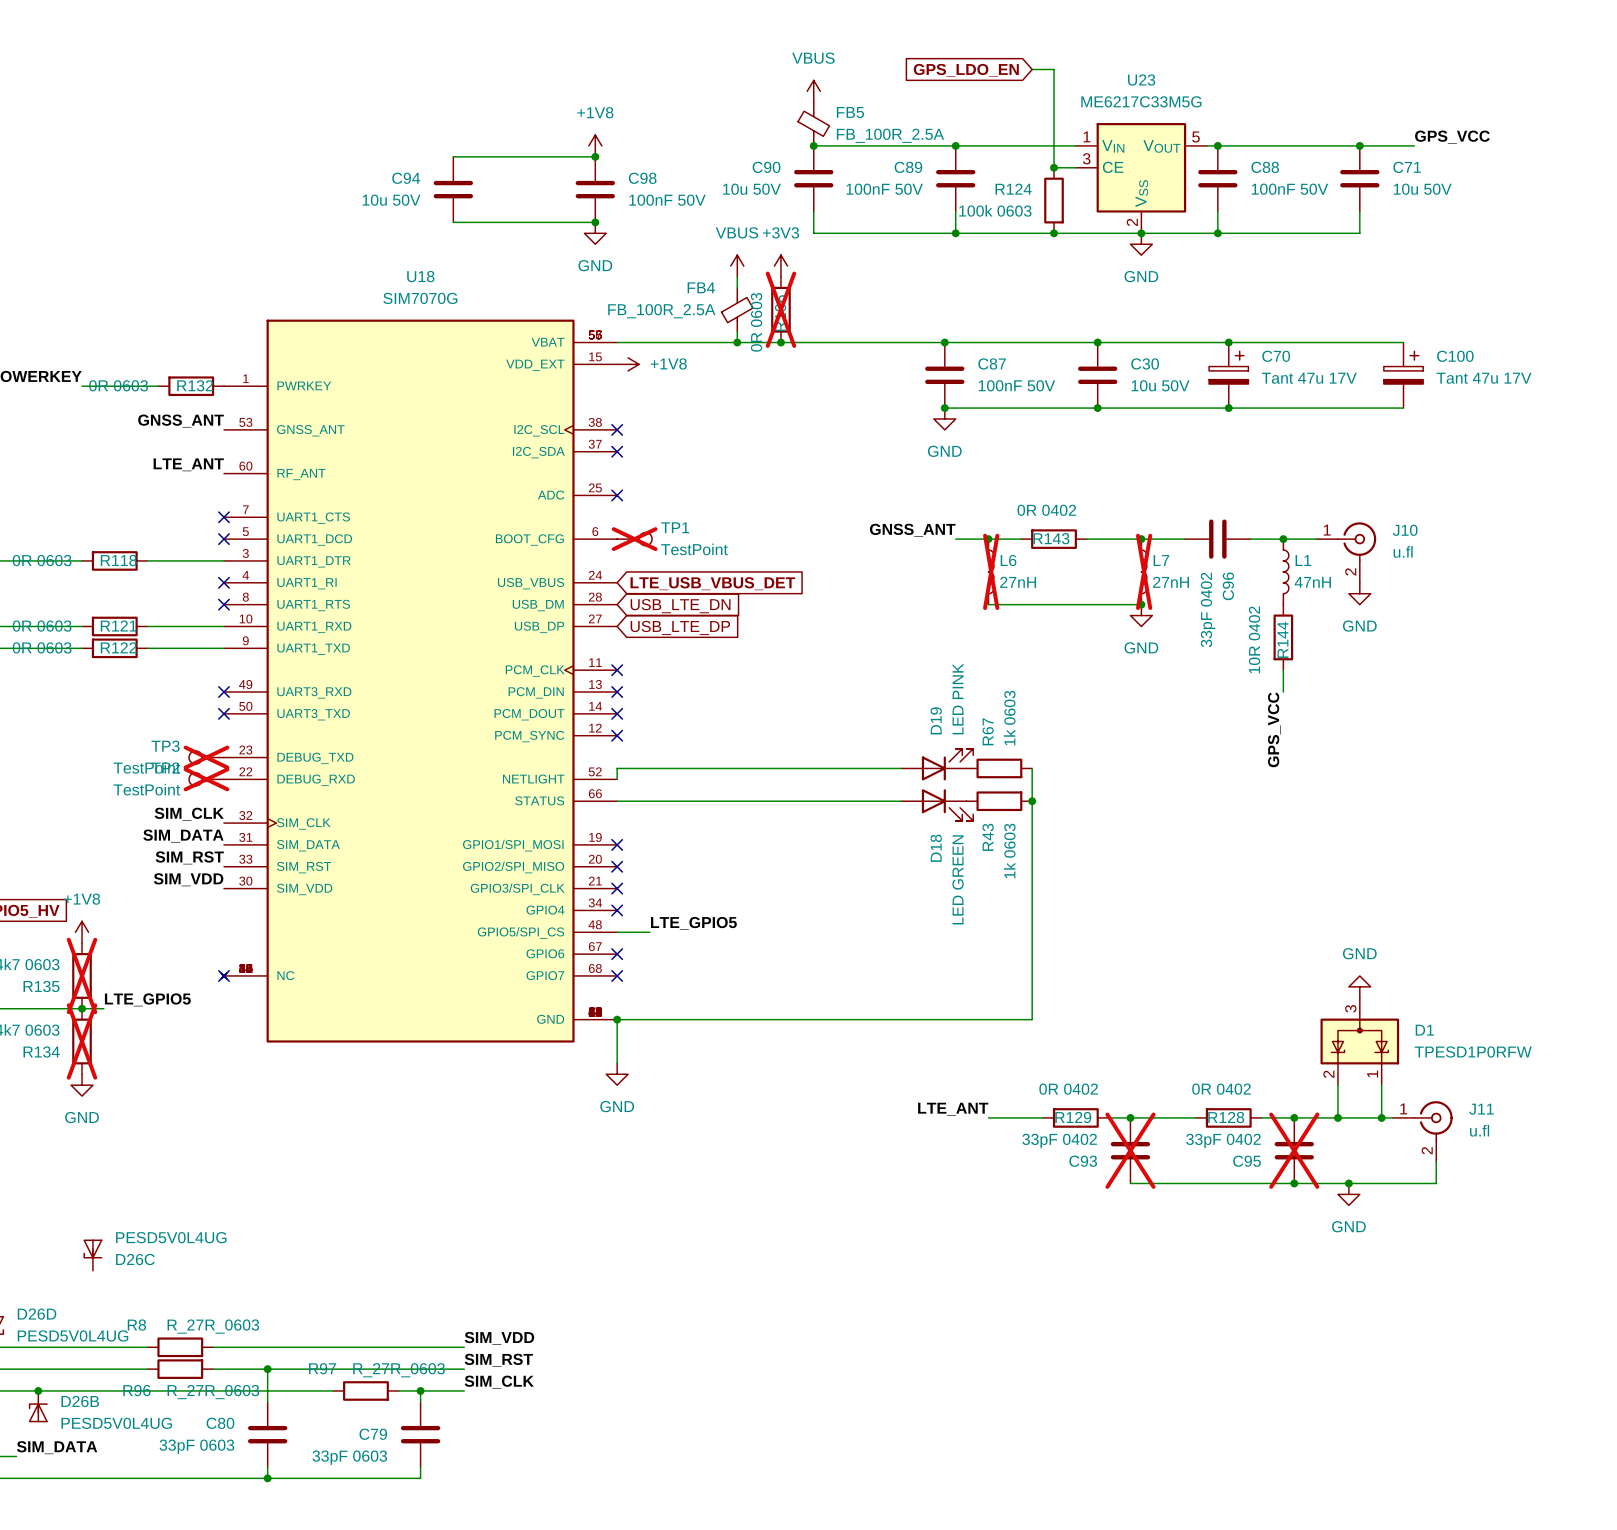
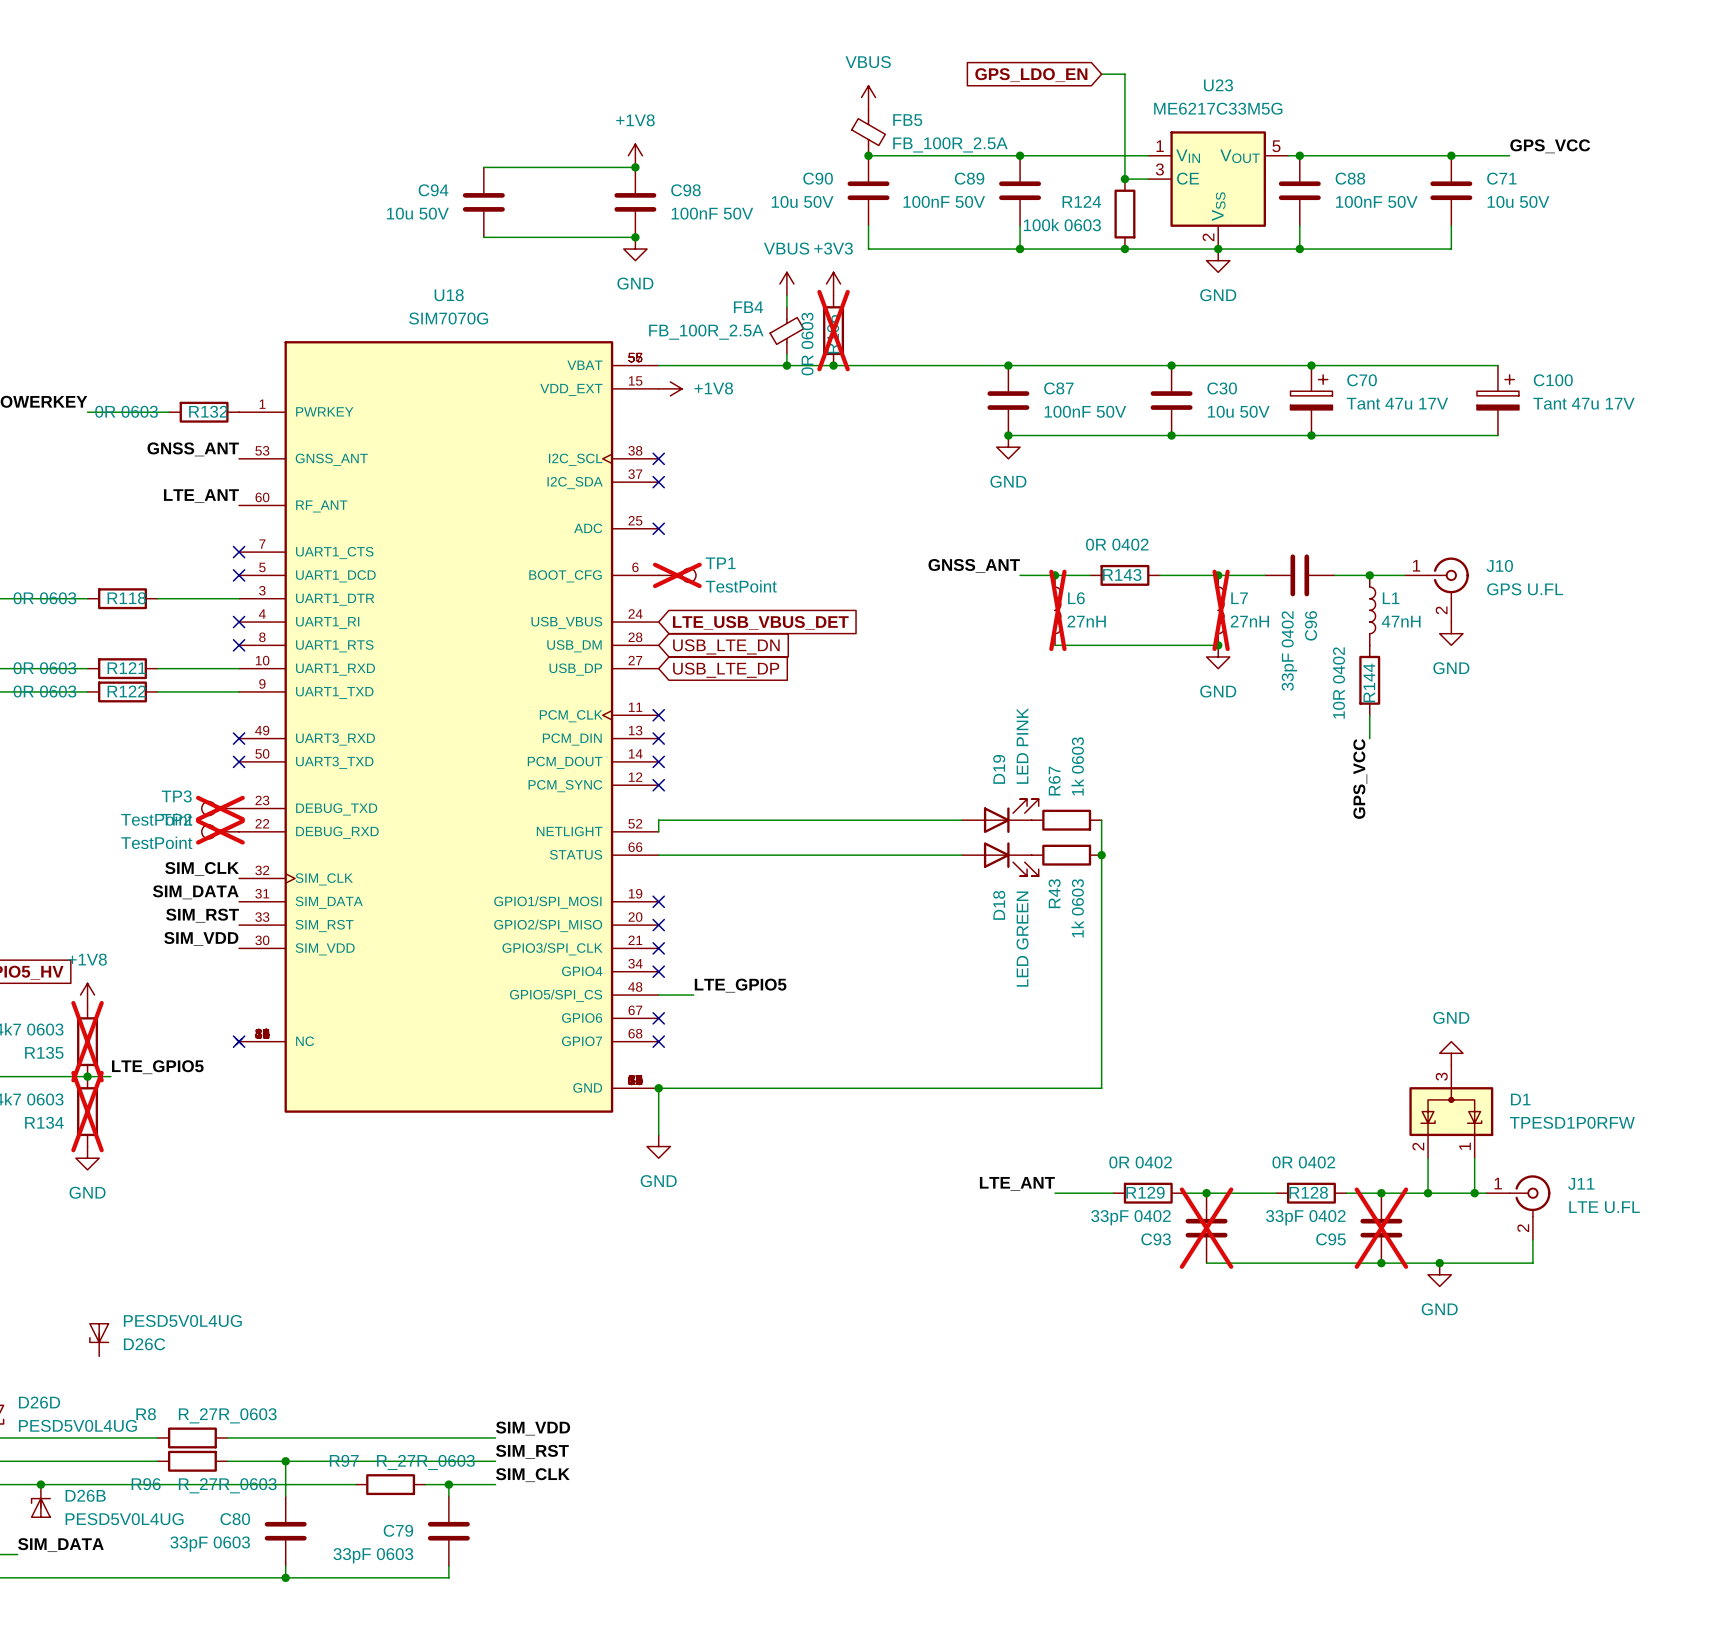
J10 value: u.fl (1403, 551) -> GPS U.FL (1525, 589)
J11 value: u.fl (1479, 1130) -> LTE U.FL (1604, 1207)

